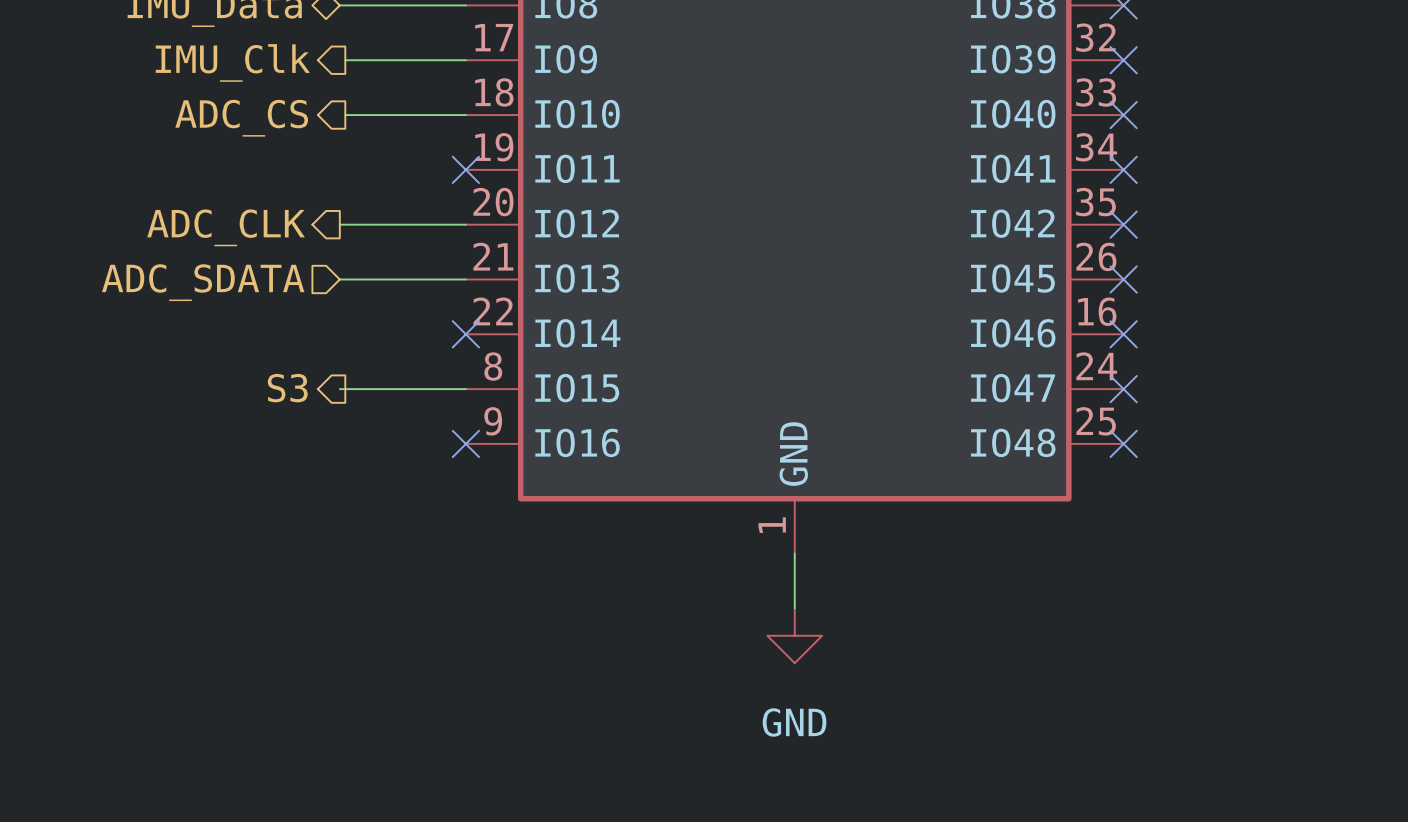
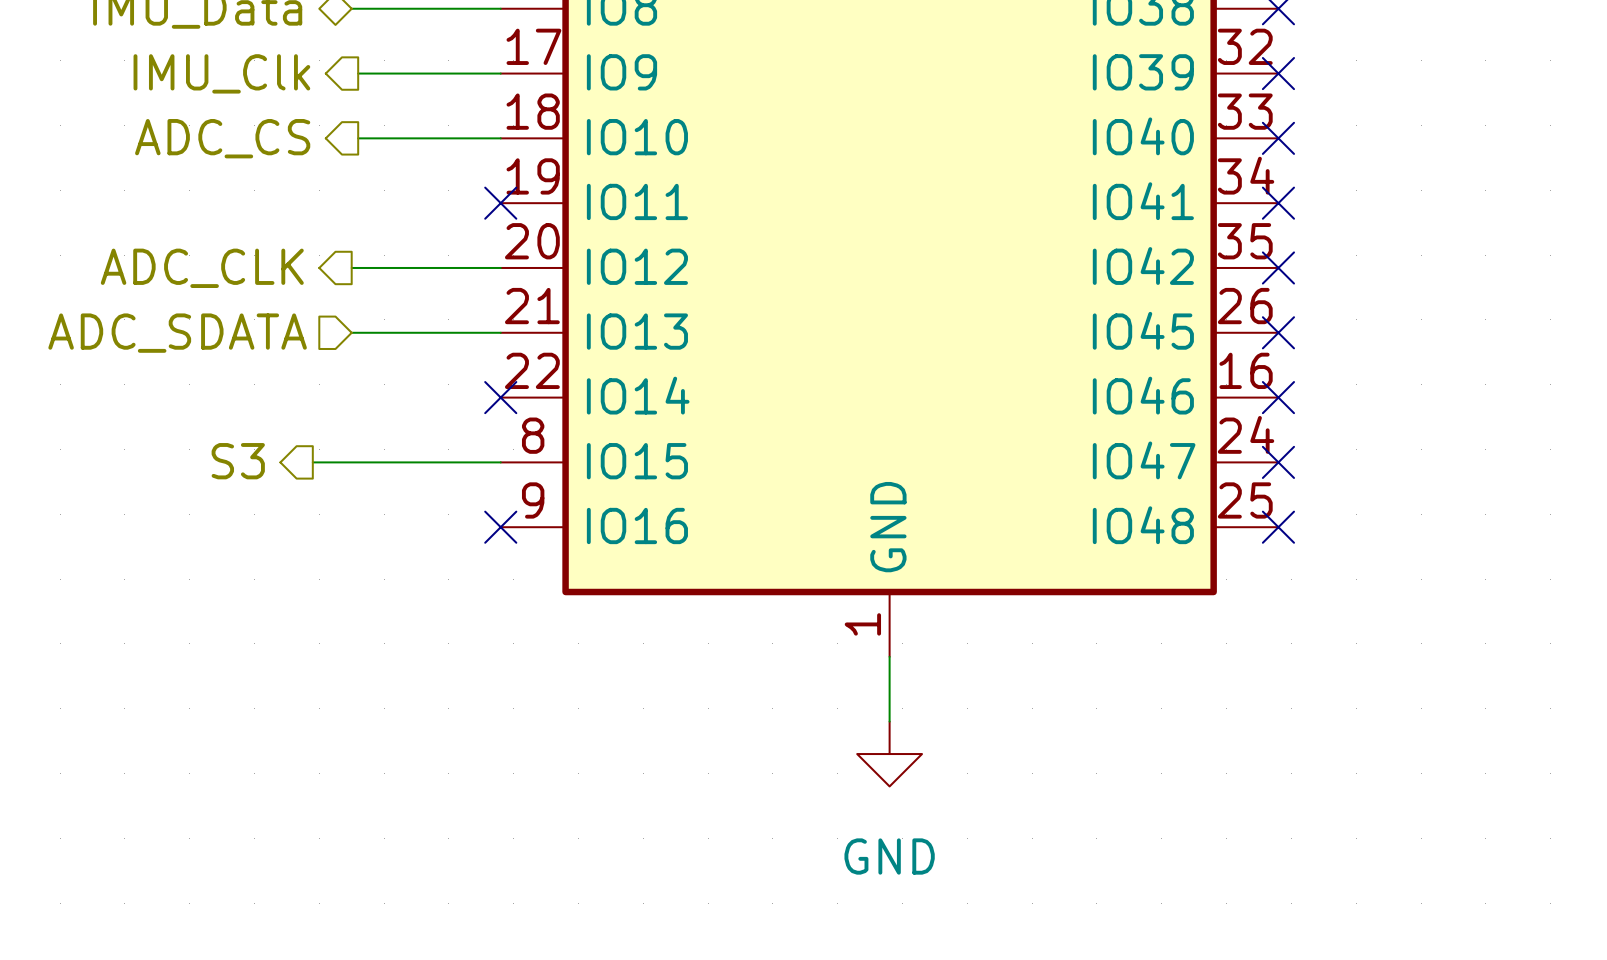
hierarchical label position: S3 (287, 388) -> S3 (238, 461)
wire: none -> (312, 462) (351, 462)

